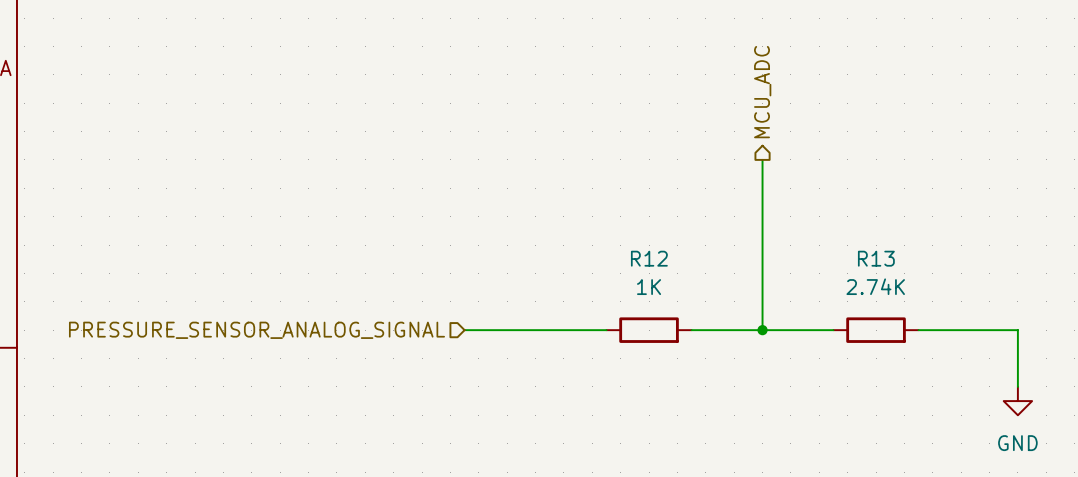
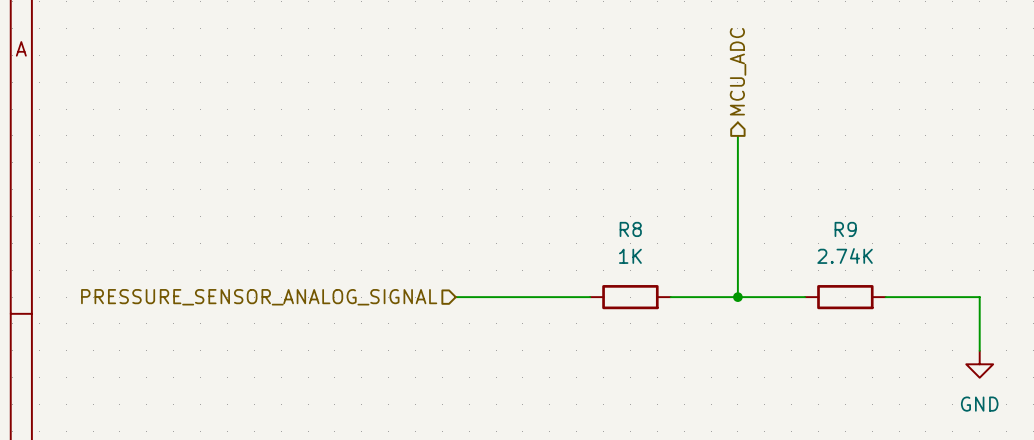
R12 name: R12 (649, 258) -> R8 (630, 229)
R13 name: R13 (876, 258) -> R9 (845, 229)

